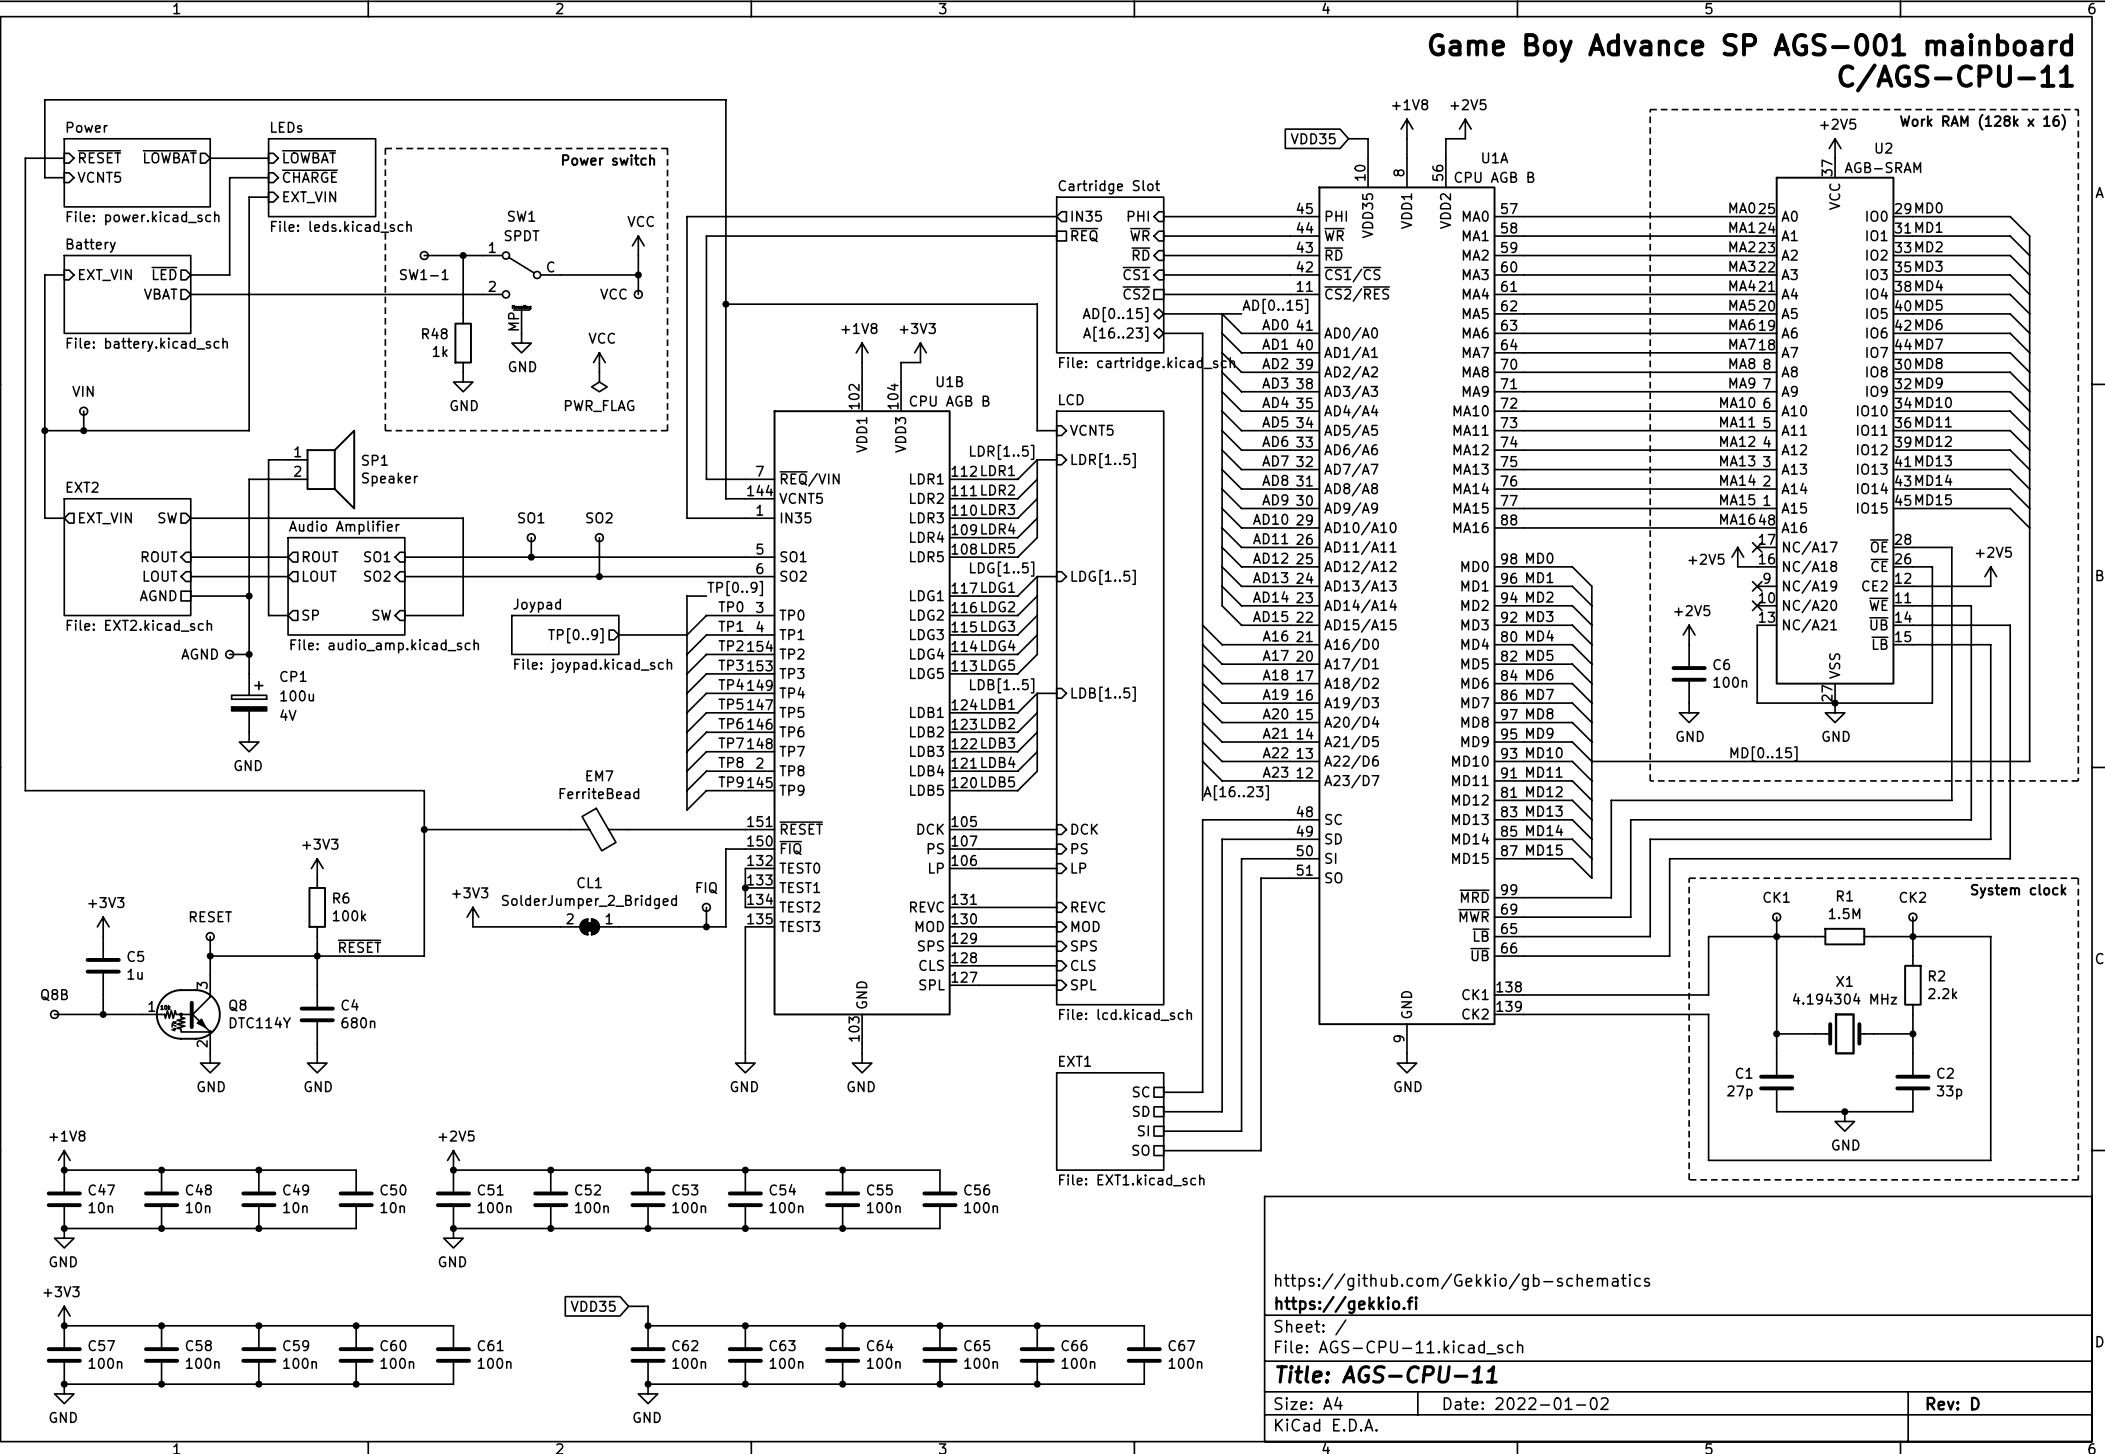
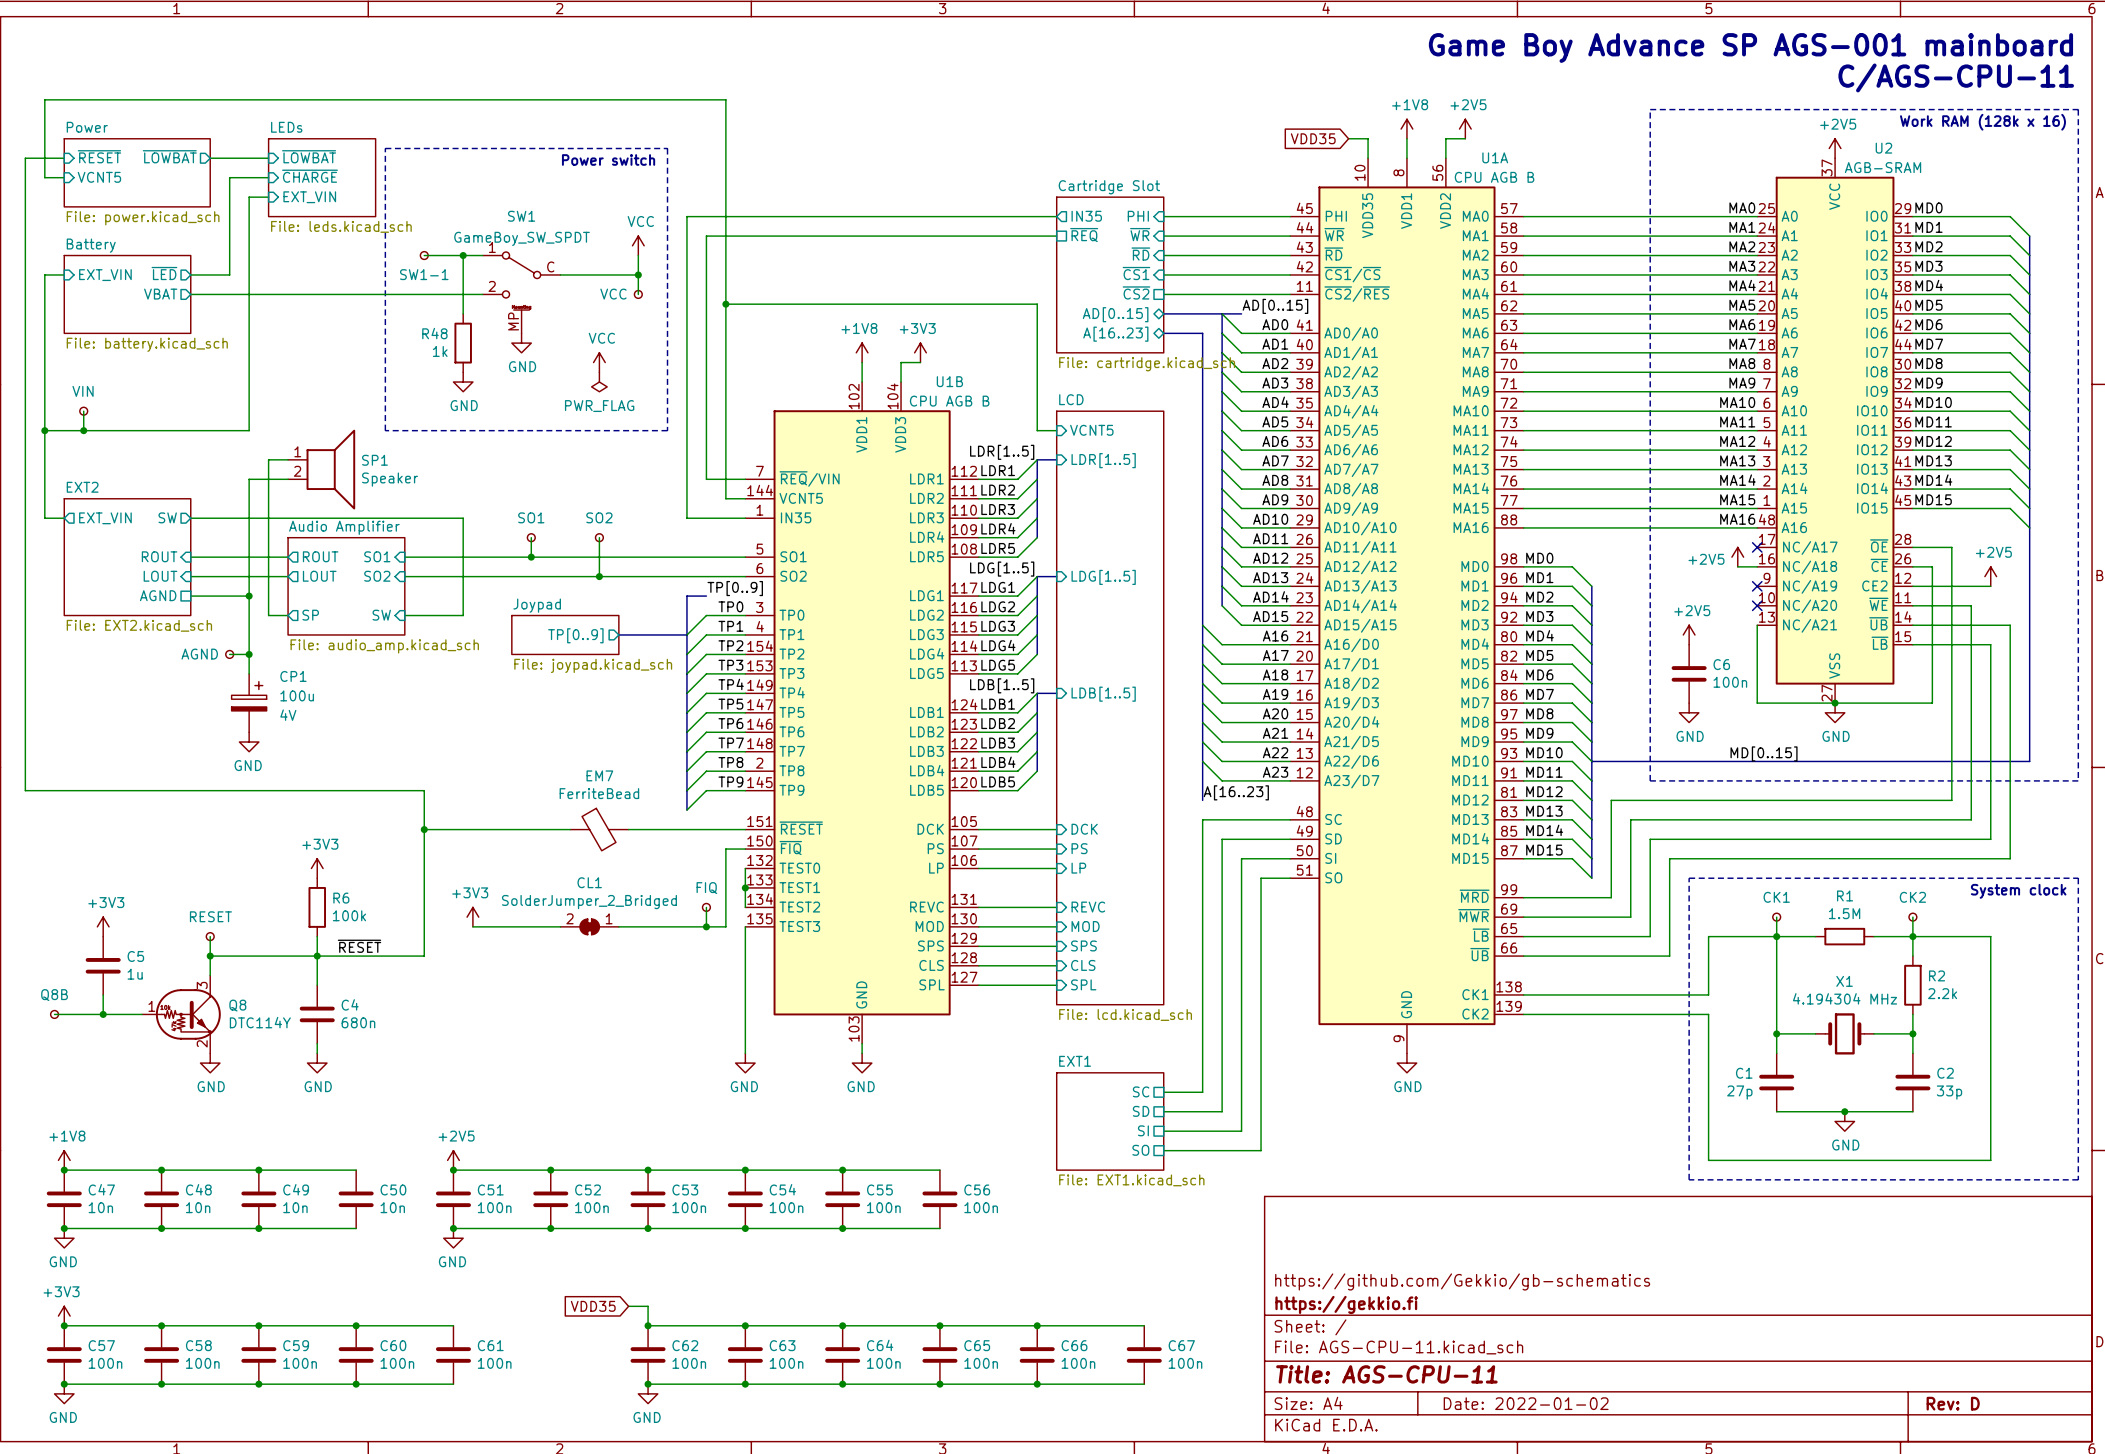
SW1 value: SPDT (522, 235) -> GameBoy_SW_SPDT (522, 238)

